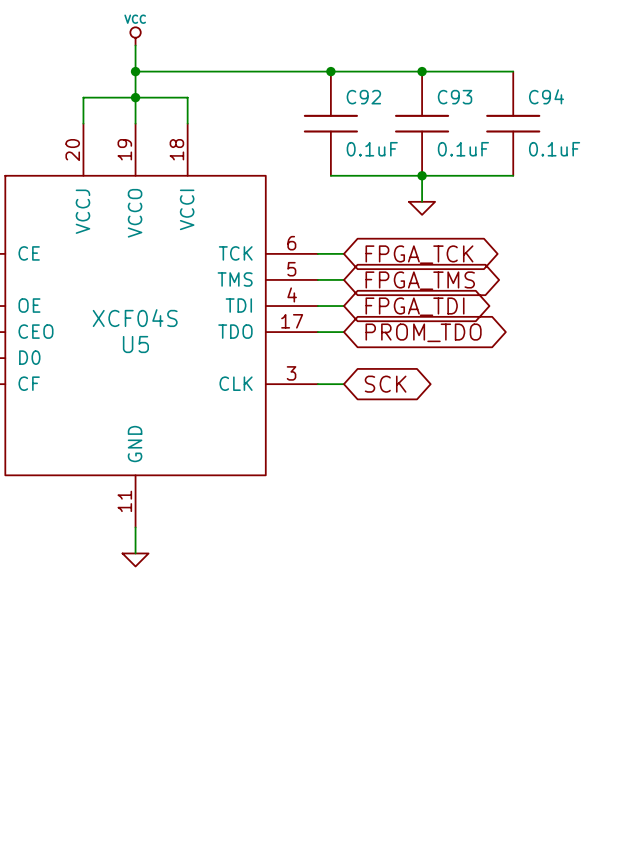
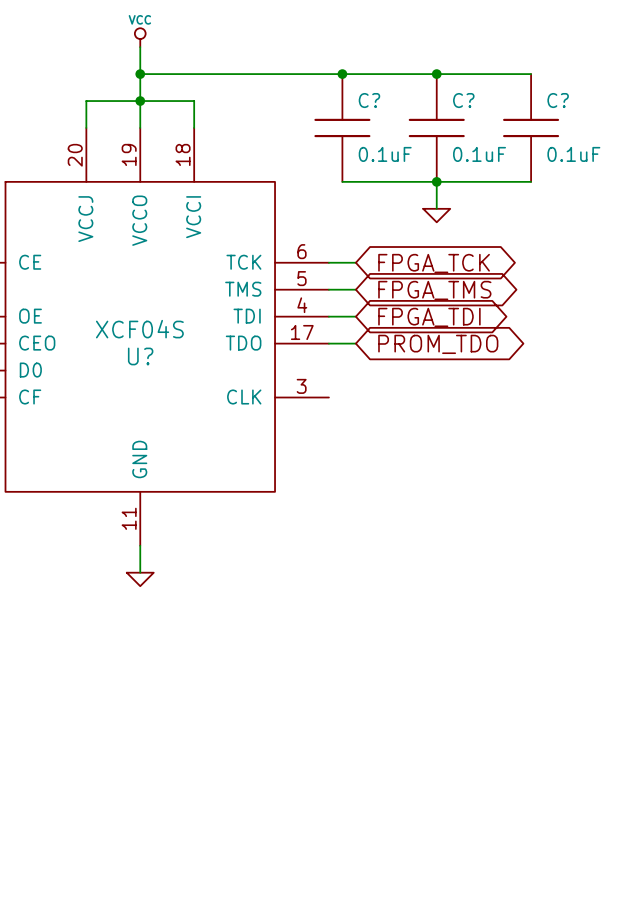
C94 name: C94 (546, 96) -> C? (558, 100)
C92 name: C92 (363, 97) -> C? (369, 100)
C93 name: C93 (455, 97) -> C? (463, 100)
U5 name: U5 (135, 344) -> U? (140, 356)
wire: (317, 384) (343, 384) -> none
global label: SCK (385, 384) -> none

